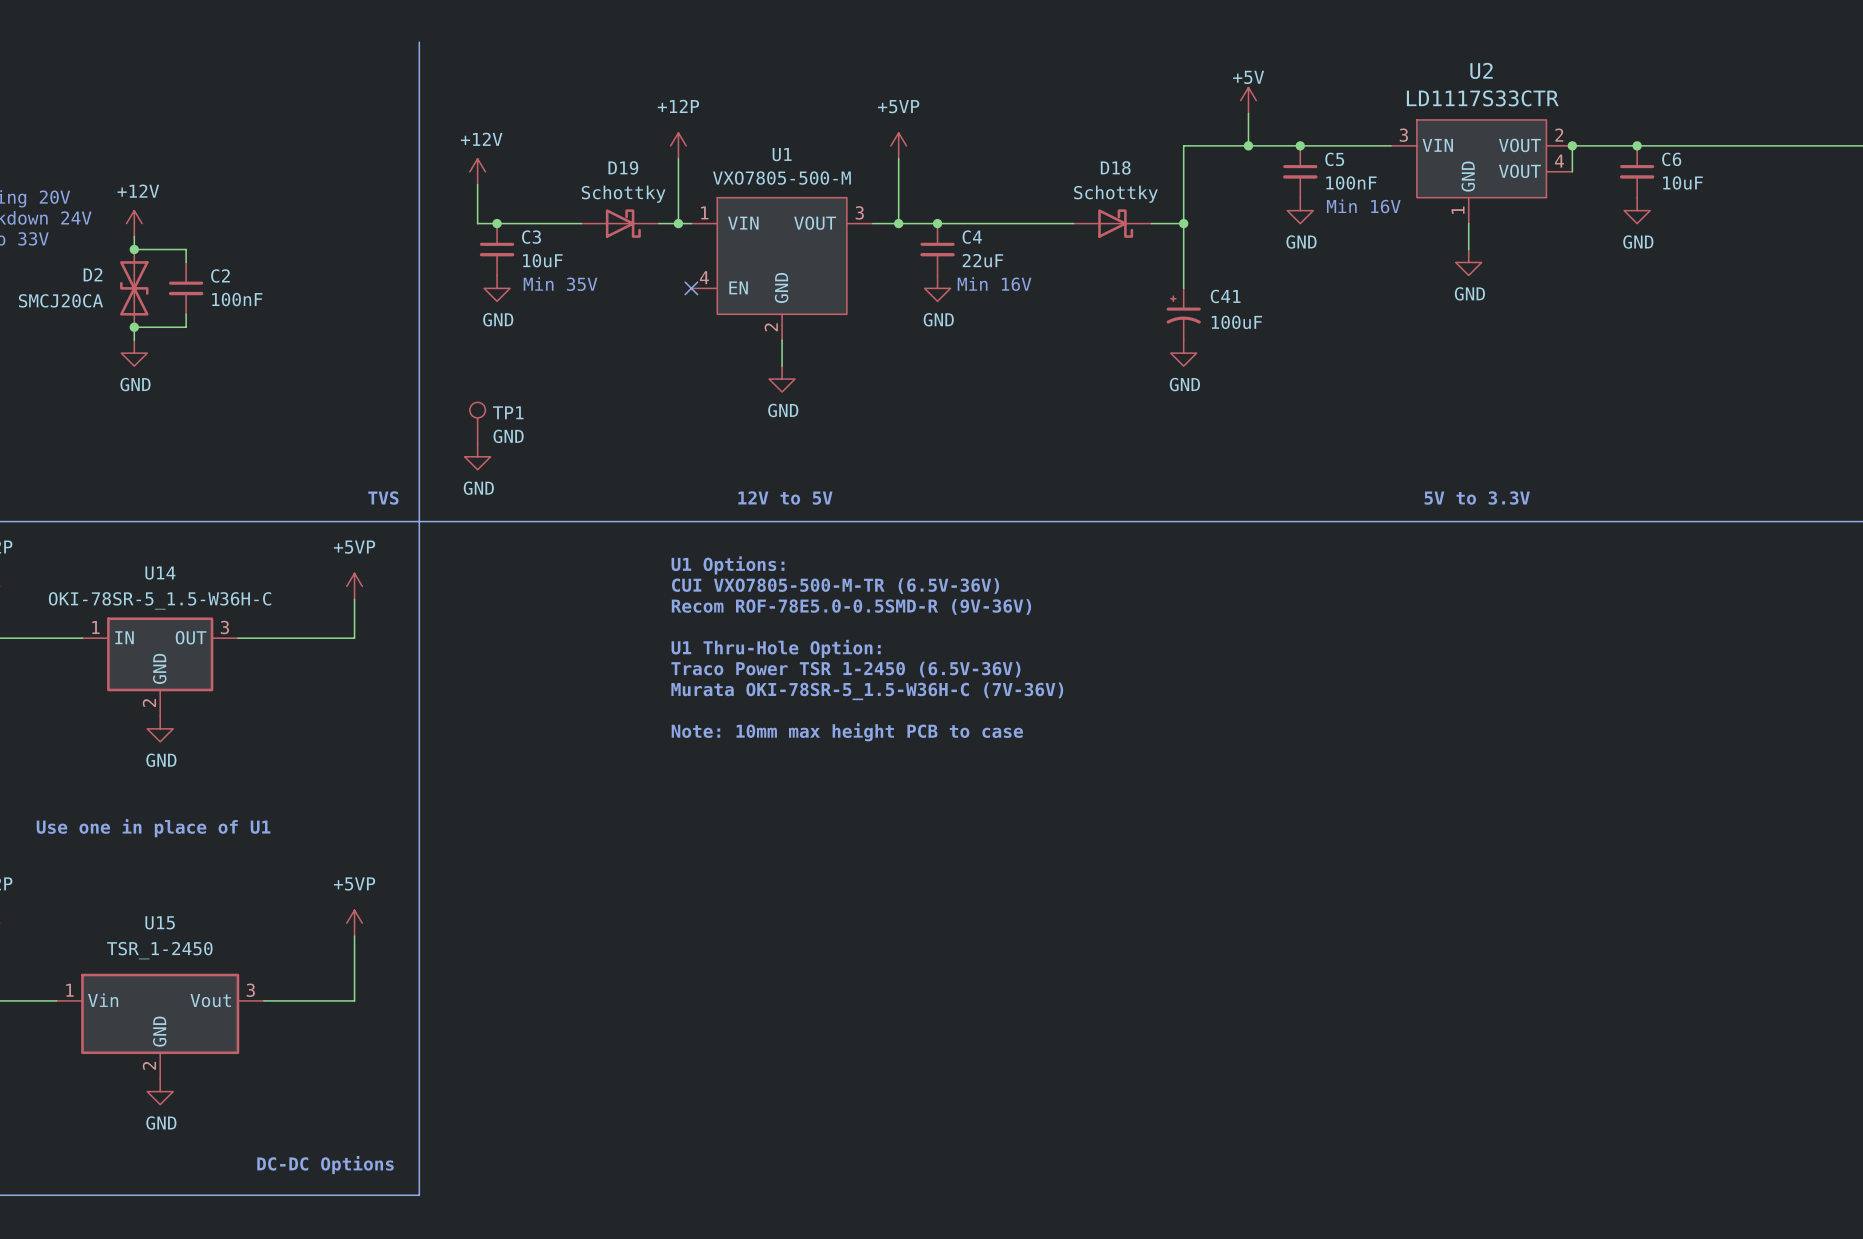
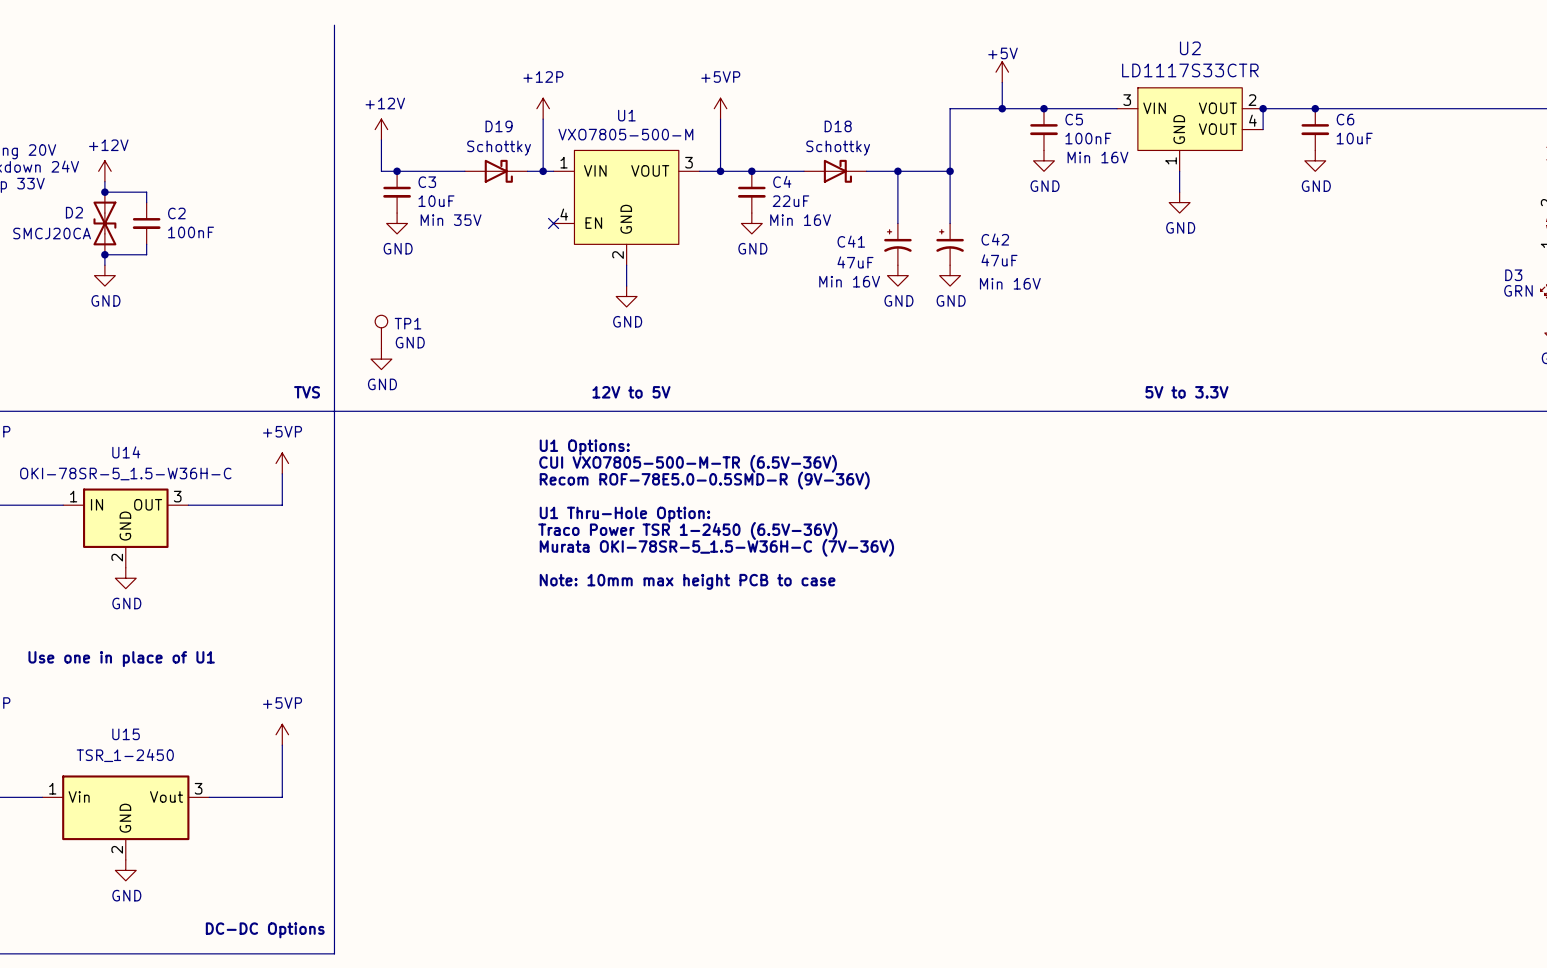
D18 position: (1112, 223) -> (835, 171)
wire: none -> (897, 171) (897, 223)
junction: none -> (897, 171)
C41 name: C41 (1225, 296) -> C42 (995, 239)
C41: none -> 47uF (897, 244)
C41 value: 100uF (1236, 322) -> 47uF (999, 260)
power symbol: none -> GND (897, 275)
text: none -> Min 16V (849, 281)
text: none -> Min 16V (1010, 283)

